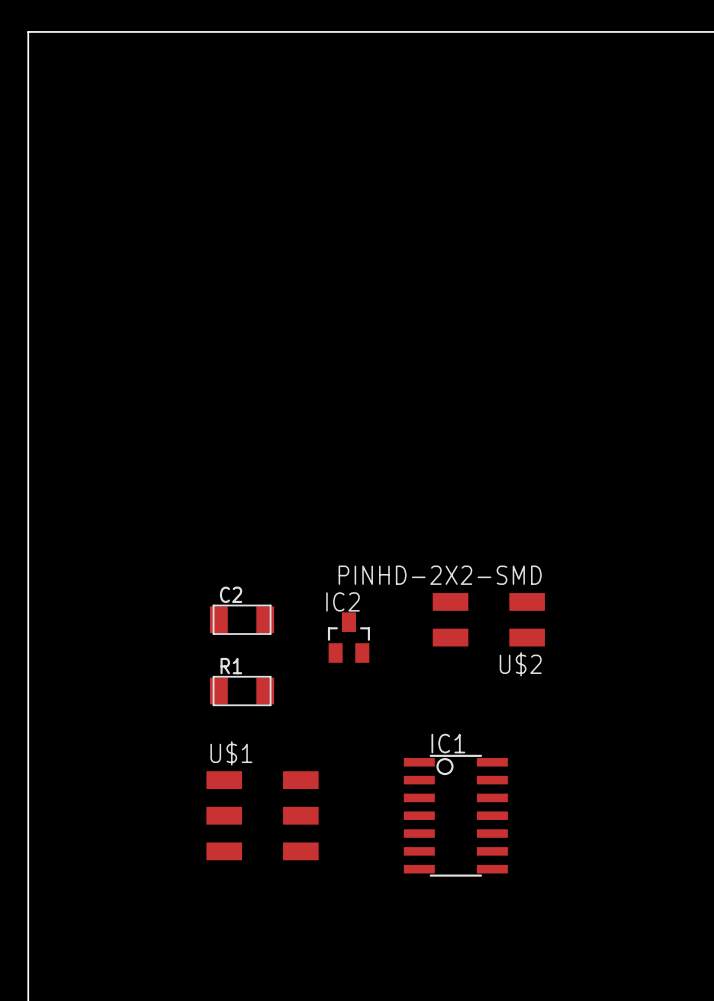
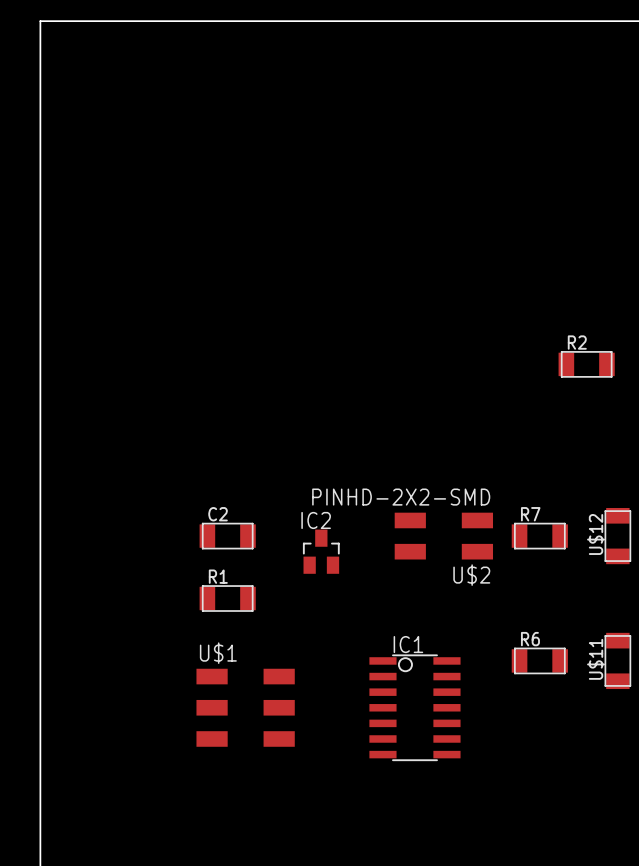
R2: none -> (586, 364)
R7: none -> (539, 536)
U$12: none -> (617, 536)
R6: none -> (539, 660)
U$11: none -> (617, 660)

